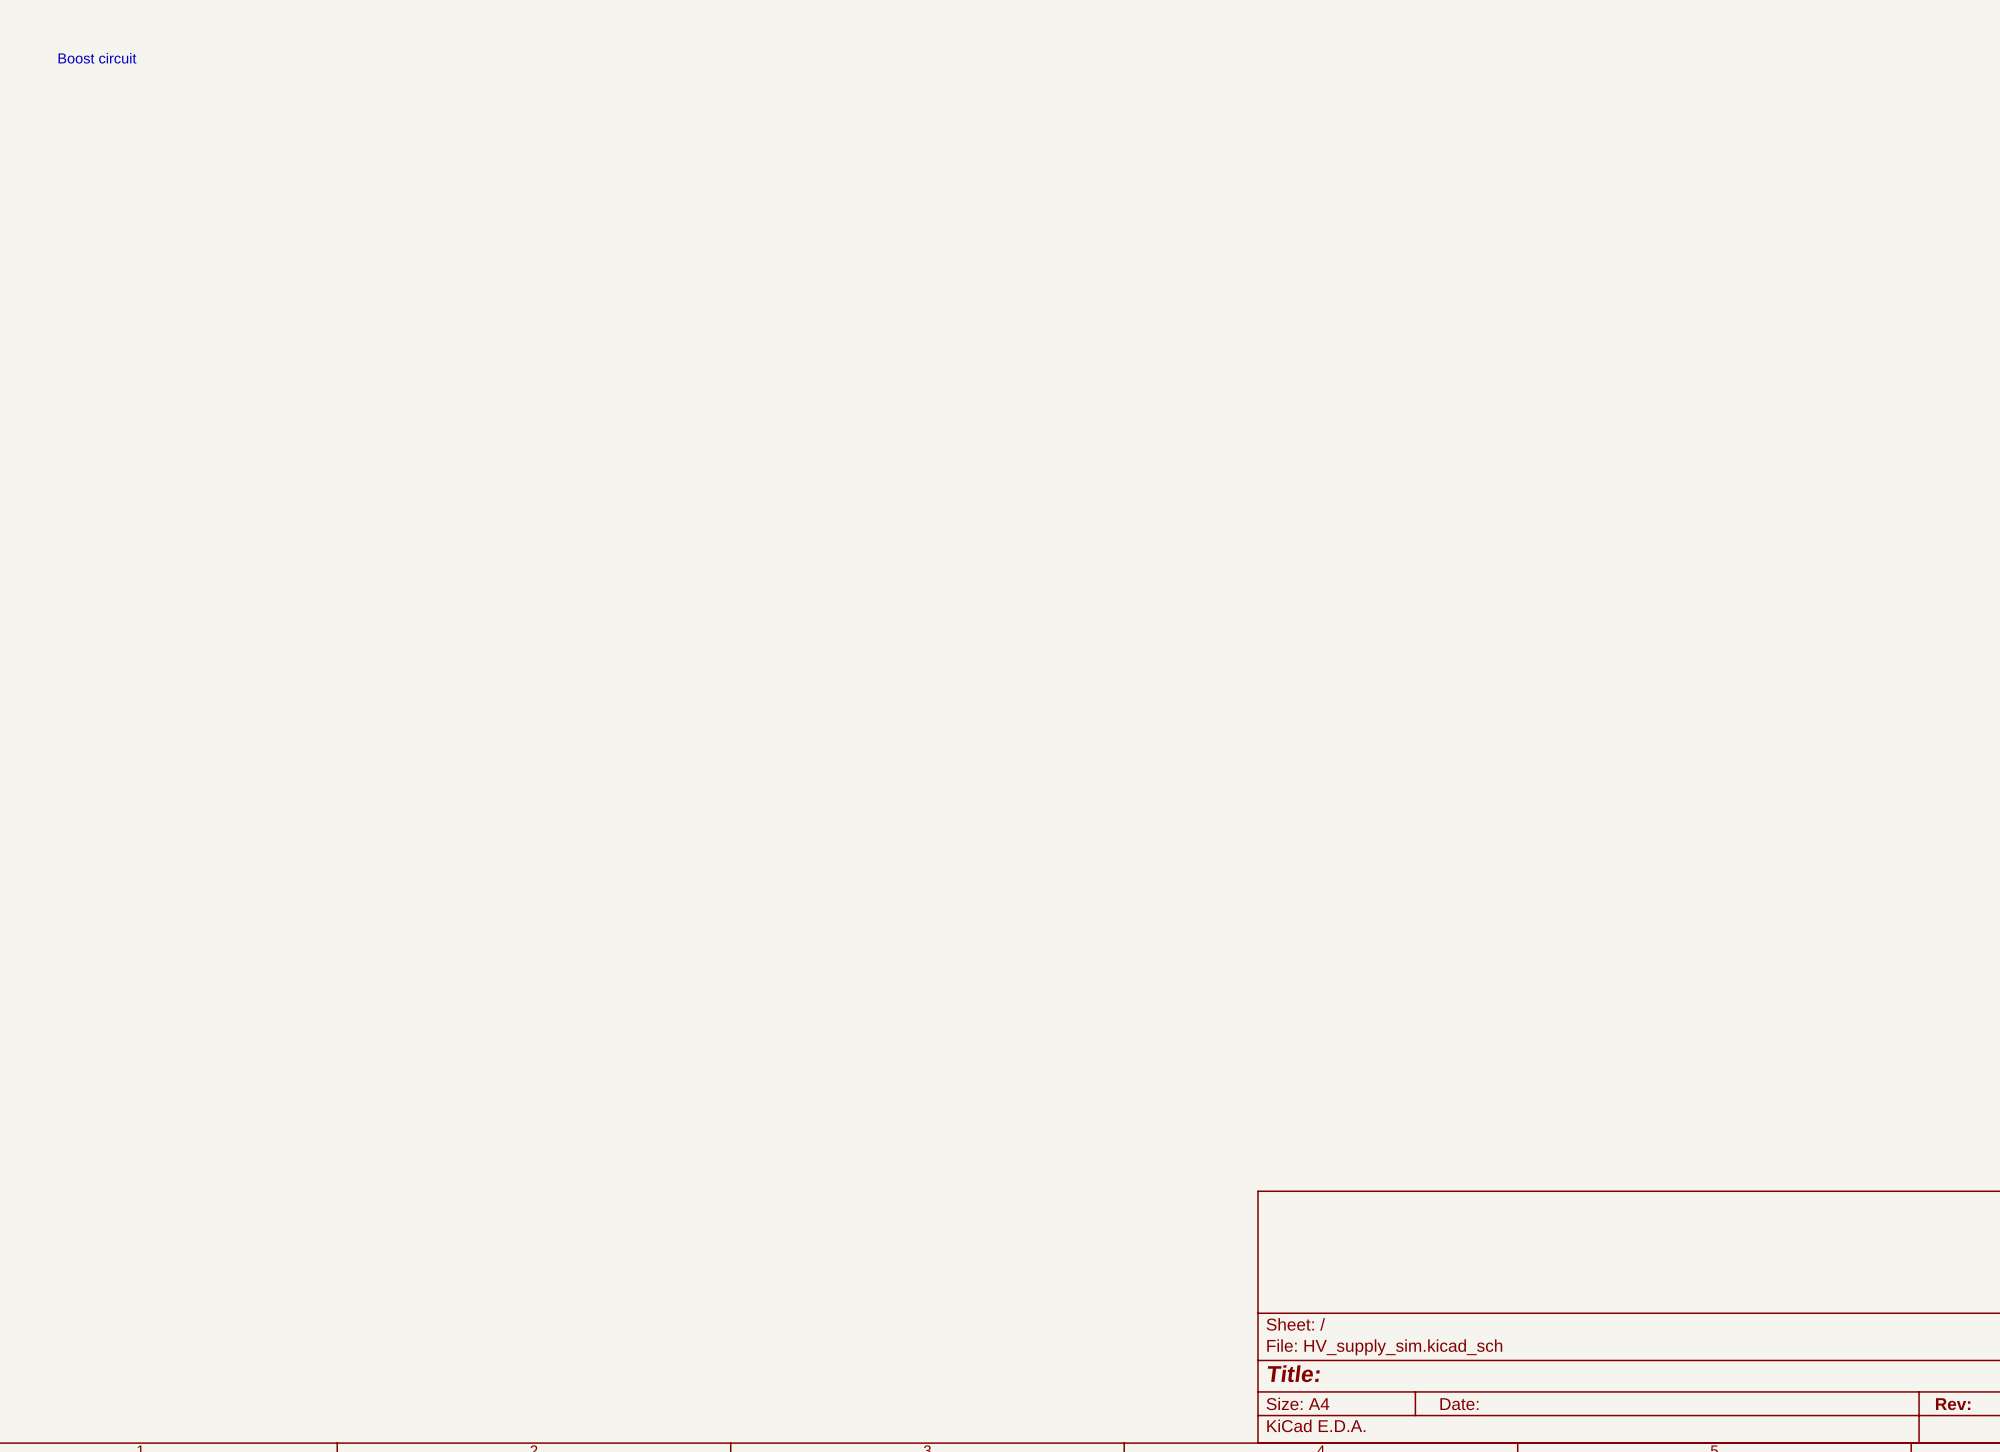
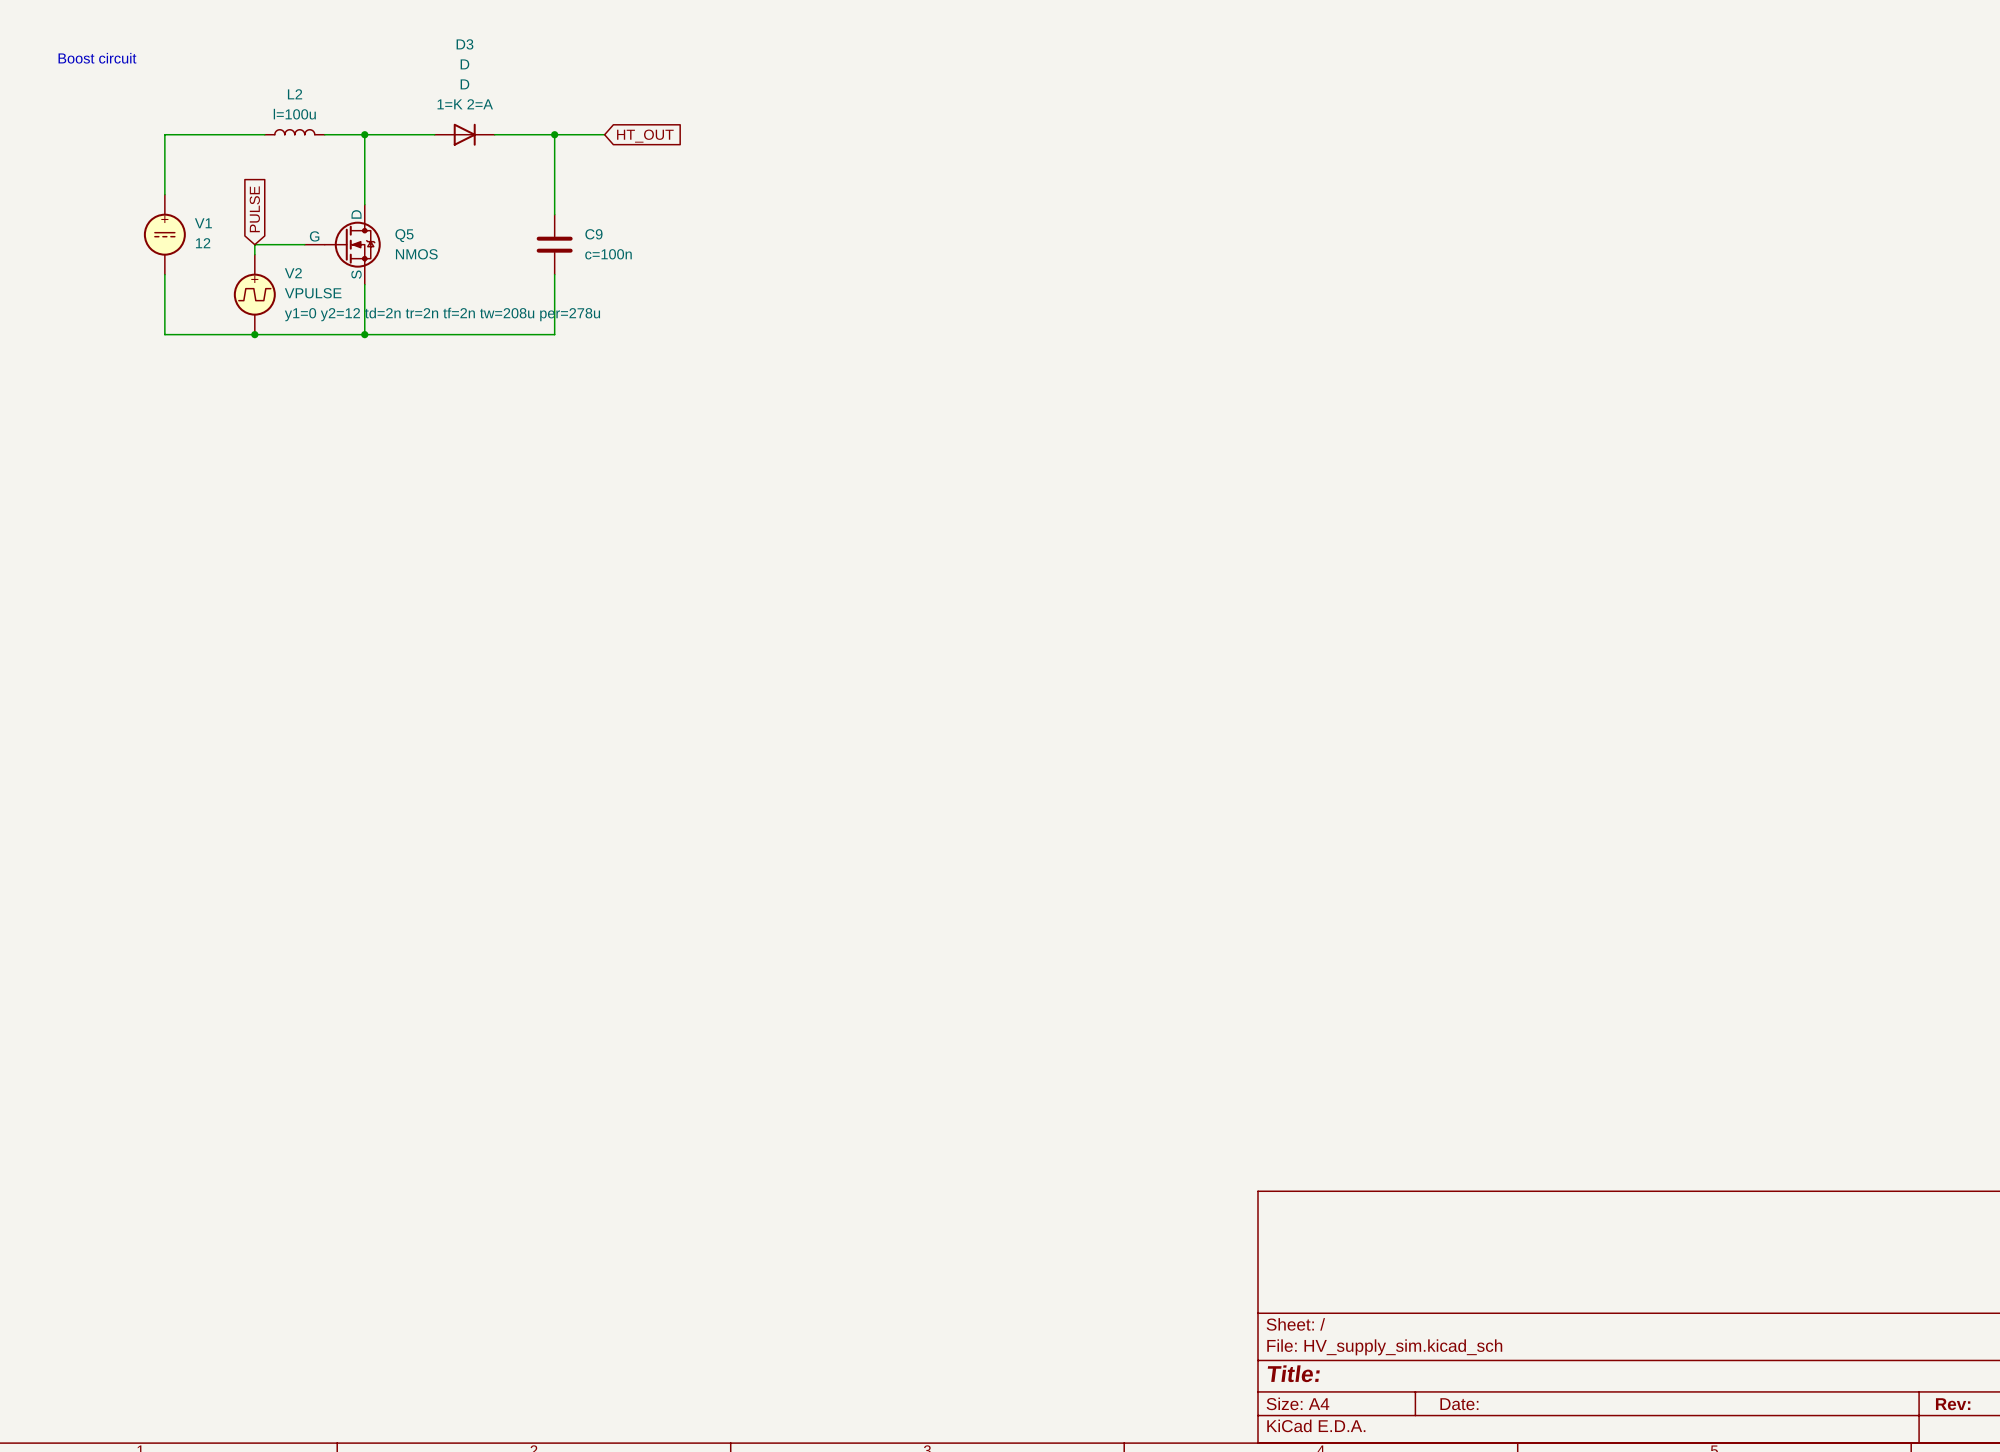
L2: none -> l=100u (294, 132)
wire: none -> (264, 134) (164, 134) (164, 194)
wire: none -> (324, 134) (434, 134)
wire: none -> (364, 134) (364, 204)
junction: none -> (364, 134)
D3: none -> D (464, 134)
wire: none -> (494, 134) (604, 134)
wire: none -> (554, 134) (554, 214)
junction: none -> (554, 134)
global label: none -> HT_OUT (645, 136)
global label: none -> PULSE (254, 209)
V1: none -> 12 (164, 234)
wire: none -> (304, 244) (254, 244) (254, 254)
Q5: none -> NMOS (342, 244)
C9: none -> c=100n (554, 244)
wire: none -> (164, 274) (164, 334) (554, 334) (554, 274)
wire: none -> (364, 284) (364, 334)
V2: none -> VPULSE (254, 294)
junction: none -> (254, 334)
junction: none -> (364, 334)

